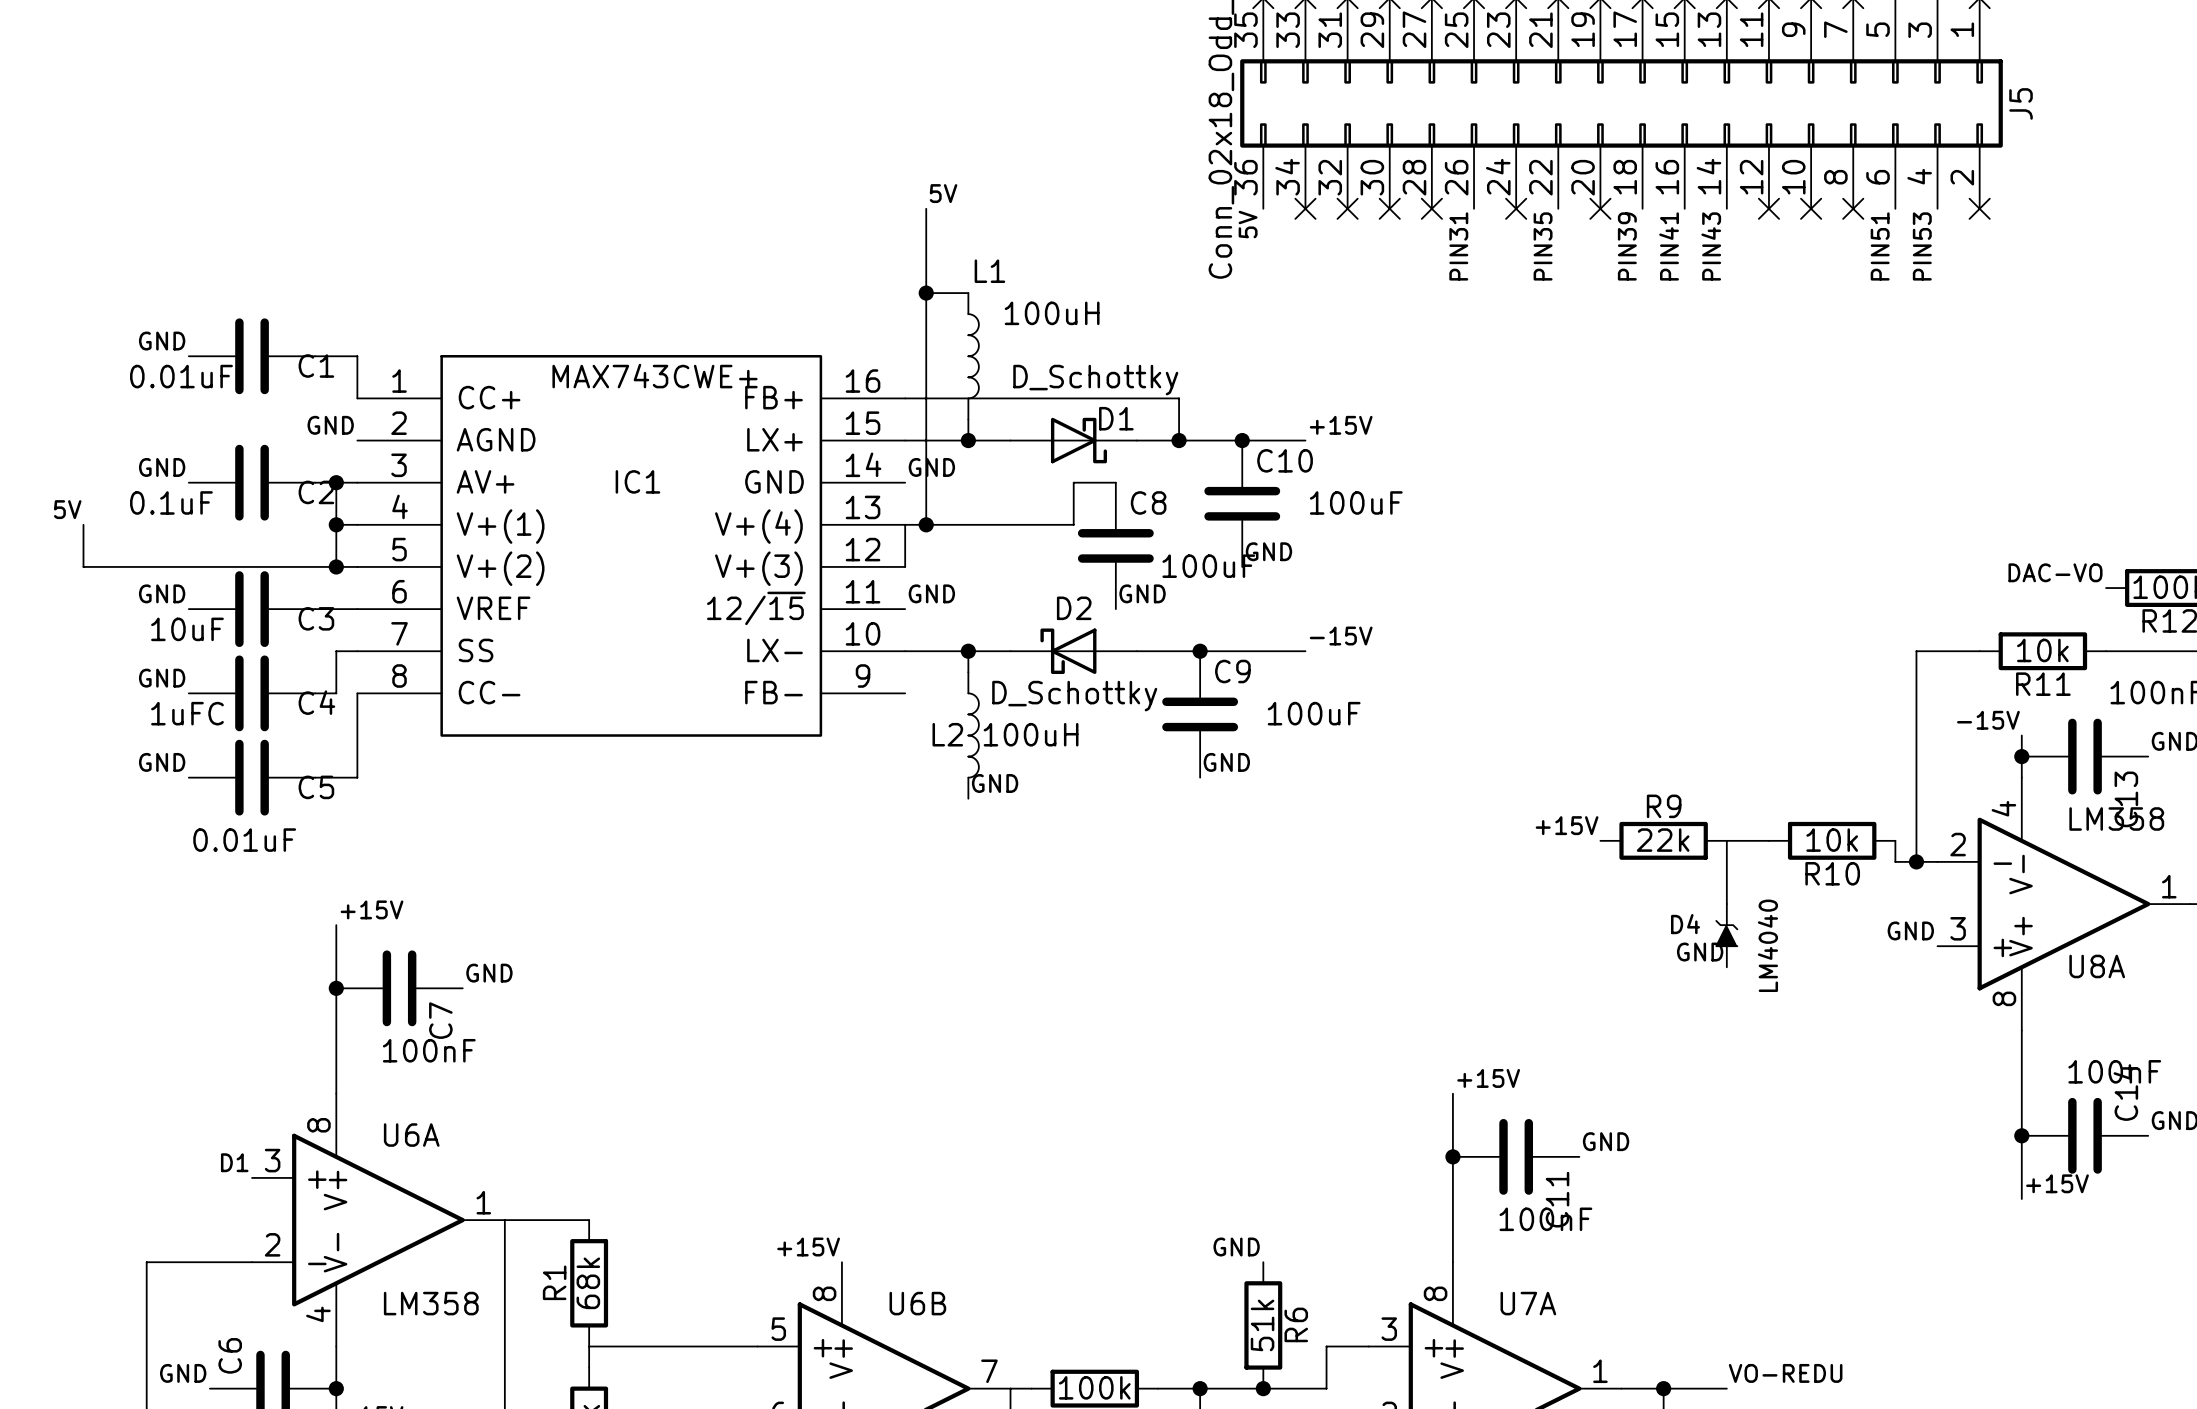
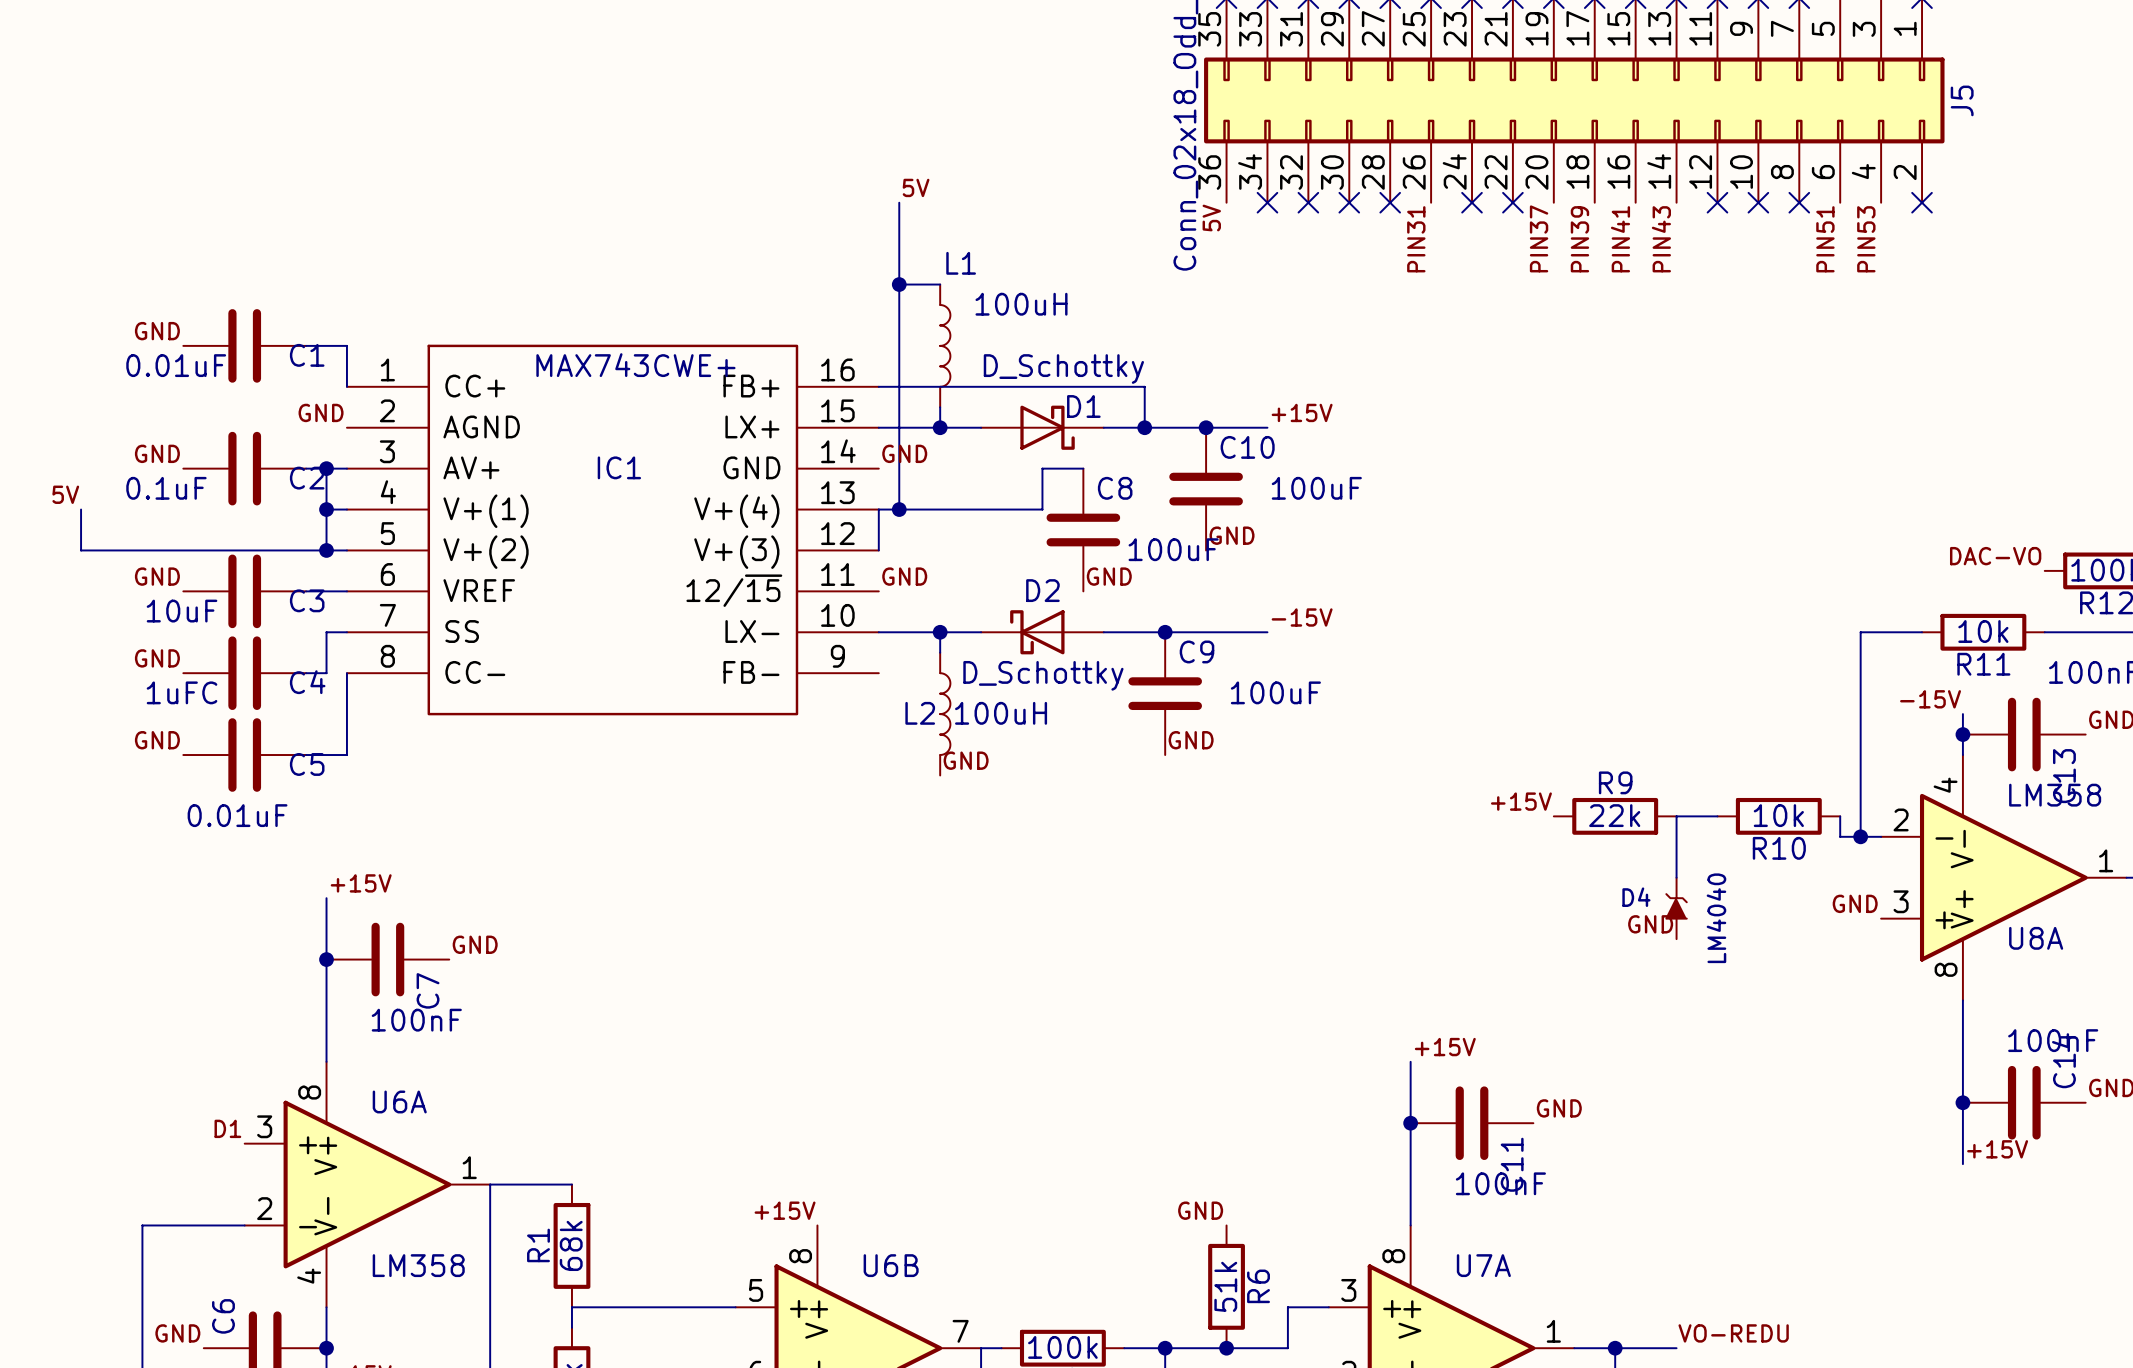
no-connect mark position: (1600, 208) -> (1512, 202)
label: PIN35 (1543, 246) -> none
label: none -> PIN37 (1539, 238)

